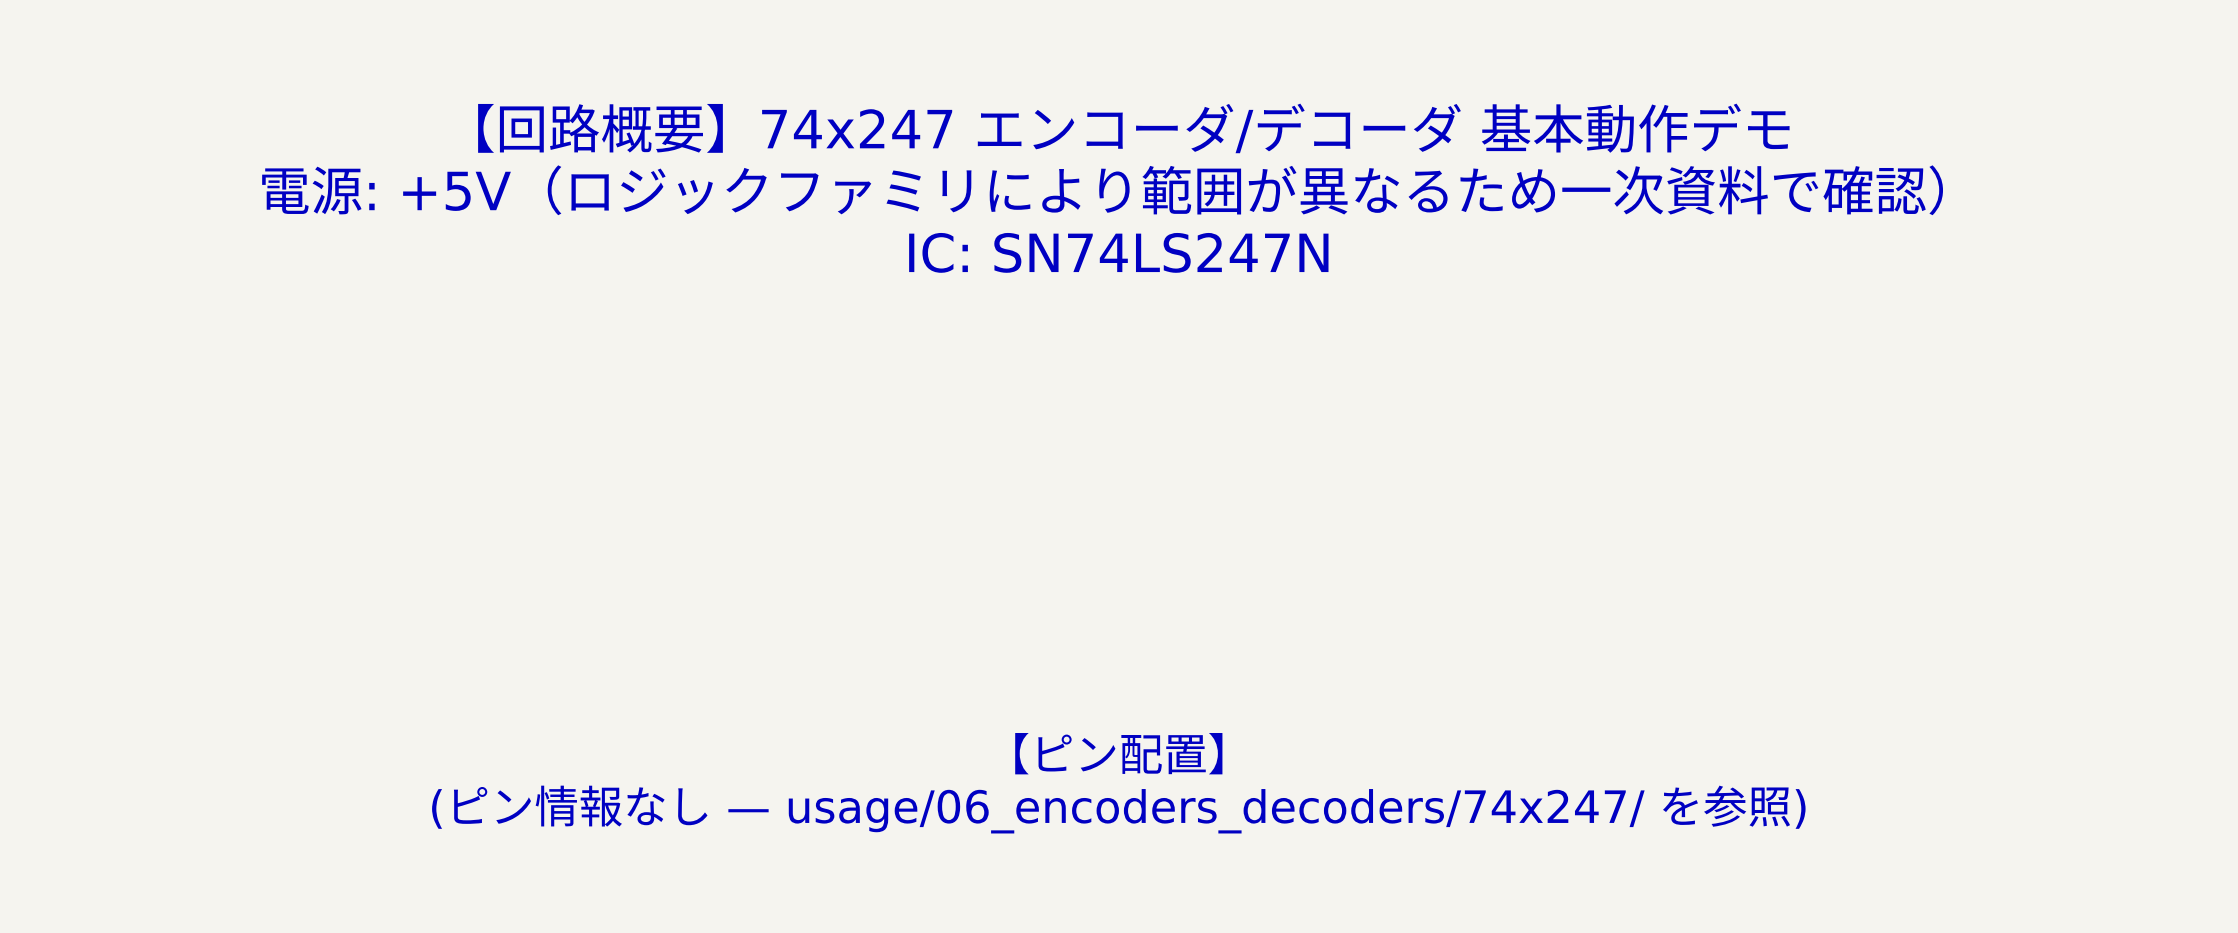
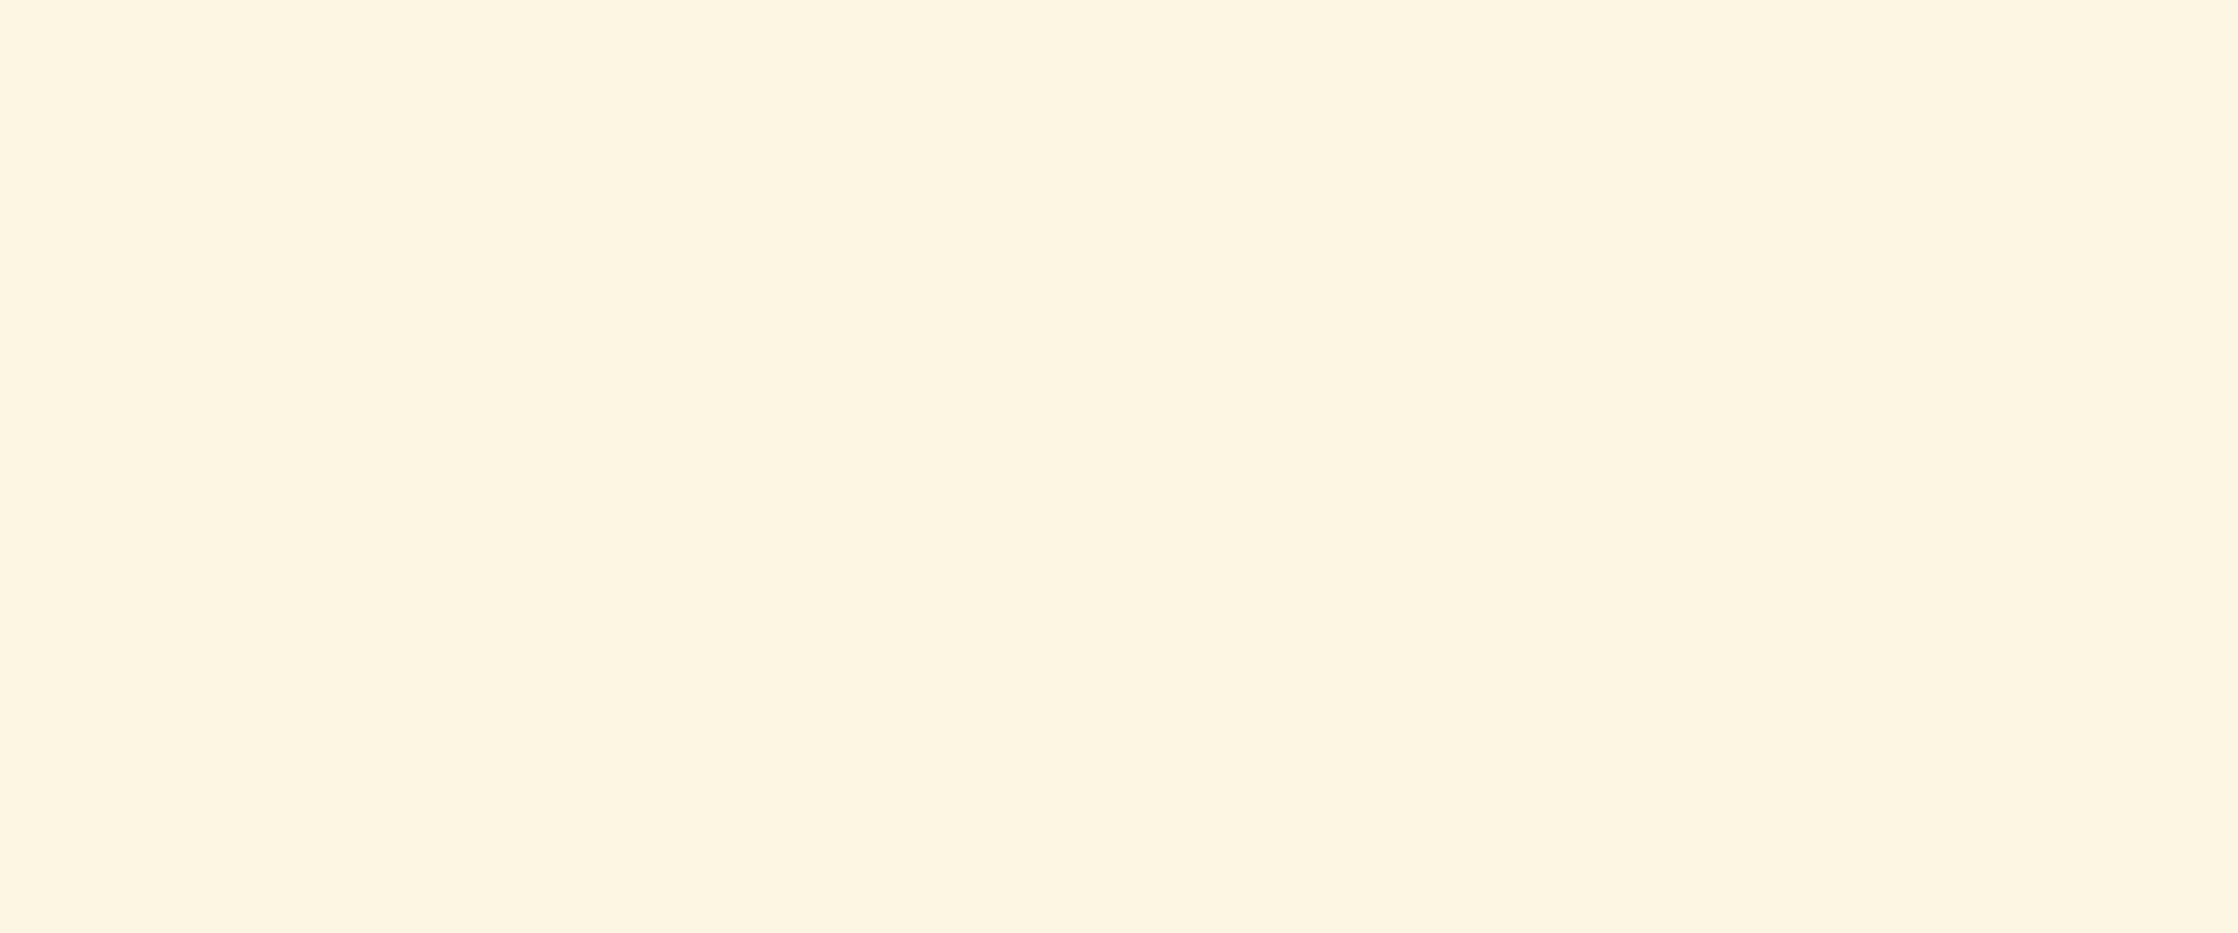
text: 【回路概要】74x247 エンコーダ/デコーダ 基本動作デモ (1133, 128) -> none
text: 電源: +5V（ロジックファミリにより範囲が異なるため一次資料で確認） (1102, 190) -> none
text: IC: SN74LS247N (1118, 252) -> none
text: 【ピン配置】 (1118, 753) -> none
text: (ピン情報なし — usage/06_encoders_decoders/74x247/ を参照) (1118, 809) -> none

